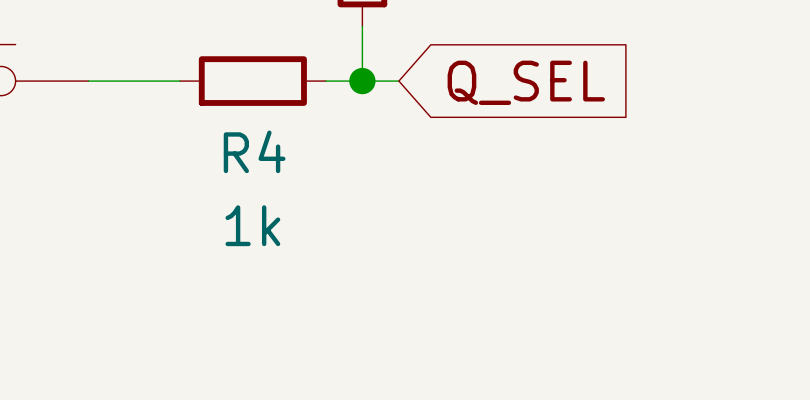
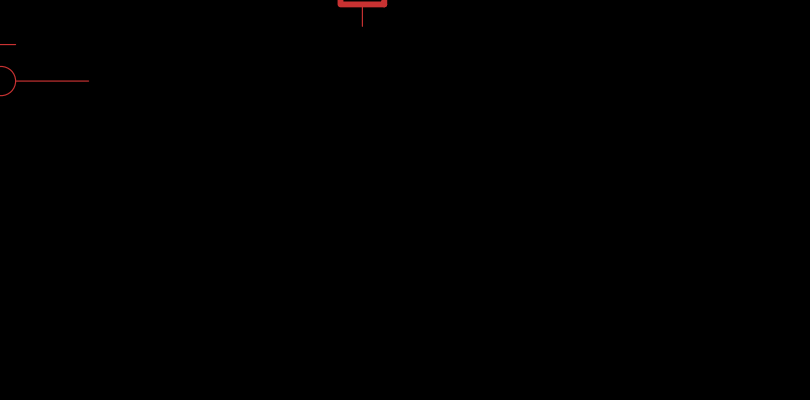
wire: (362, 26) (362, 81) -> none
wire: (88, 81) (179, 81) -> none
R4: 1k (252, 81) -> none
wire: (325, 81) (398, 81) -> none
junction: (362, 81) -> none
global label: Q_SEL (526, 82) -> none

